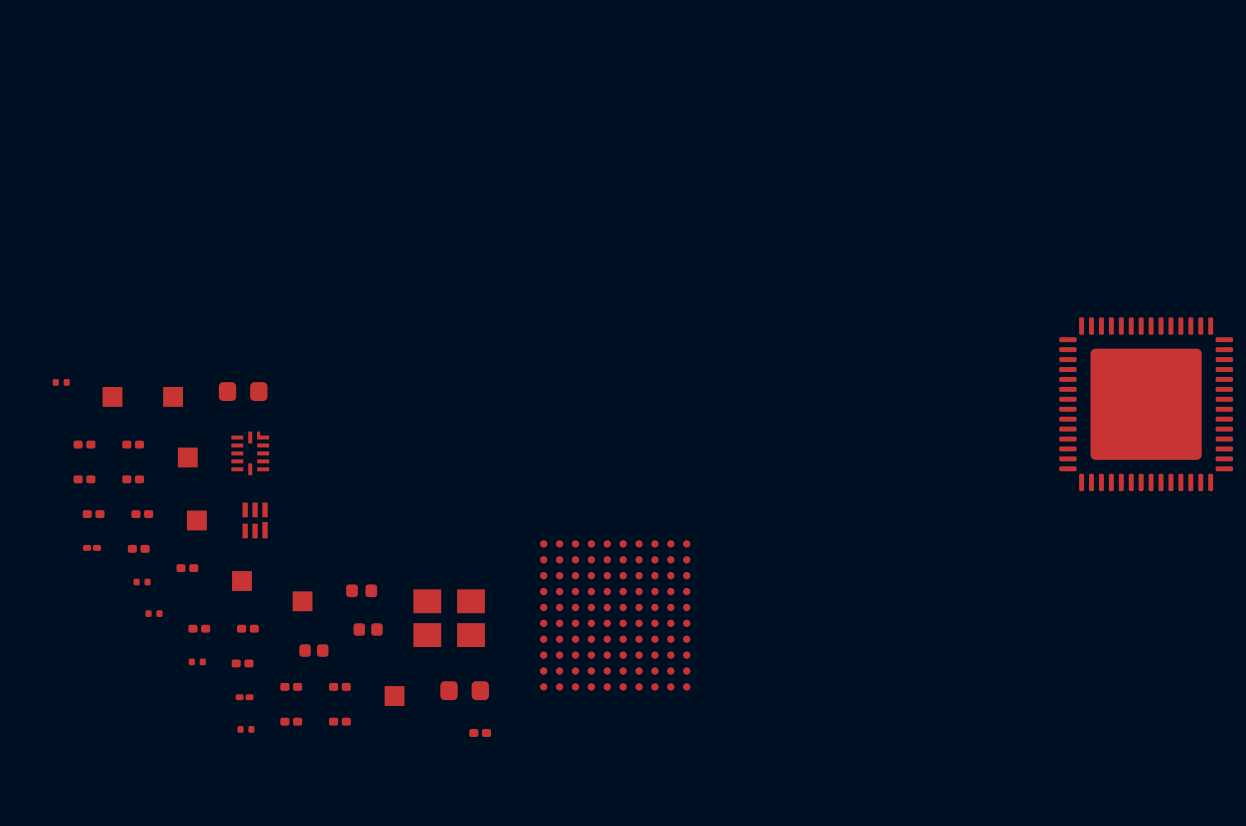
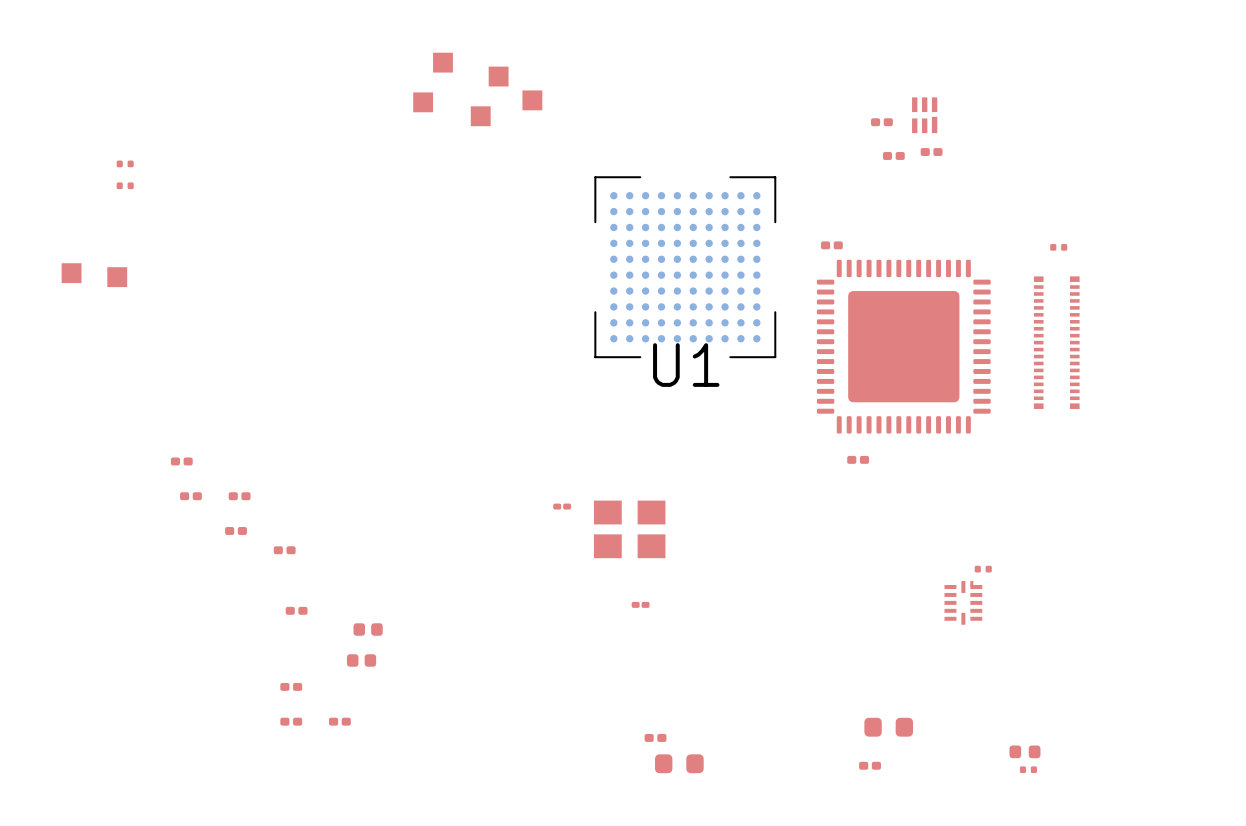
part: none -> (442, 62)
part: none -> (498, 76)
part: none -> (532, 100)
part: none -> (423, 102)
part: none -> (924, 115)
part: none -> (480, 116)
part: none -> (881, 122)
part: none -> (931, 152)
part: none -> (893, 155)
part: none -> (125, 163)
part: none -> (125, 185)
part: none -> (831, 245)
part: none -> (1058, 247)
part: none -> (71, 273)
part: none -> (117, 277)
part: none -> (1056, 342)
part: (61, 382) -> none
part: (243, 391) -> none
part: (112, 396) -> none
part: (173, 396) -> none
part position: (1146, 404) -> (903, 346)
part: (84, 444) -> none
part: (133, 444) -> none
part footprint: [177, 447, 198, 468] -> [170, 457, 193, 466]
part: (250, 453) -> none
part: none -> (858, 459)
part: (84, 479) -> none
part: (133, 479) -> none
part: none -> (190, 496)
part: none -> (239, 496)
part: none -> (562, 506)
part: (93, 514) -> none
part: (142, 514) -> none
part: (196, 520) -> none
part: (255, 520) -> none
part: none -> (236, 530)
part: (92, 547) -> none
part: (138, 548) -> none
part: none -> (284, 550)
part: (187, 568) -> none
part: none -> (983, 569)
part: (241, 581) -> none
part: (142, 582) -> none
part: (361, 590) -> none
part footprint: [292, 591, 313, 612] -> [285, 606, 308, 615]
part: none -> (963, 602)
part: none -> (640, 604)
part: (153, 613) -> none
U1 side: top (615, 615) -> bottom (685, 267)
part position: (449, 618) -> (629, 529)
part: (199, 628) -> none
part: (247, 628) -> none
part position: (313, 650) -> (361, 660)
part: (197, 661) -> none
part: (242, 663) -> none
part: (339, 686) -> none
part: (464, 690) -> none
part: (394, 696) -> none
part: (244, 697) -> none
part: none -> (888, 727)
part: (245, 729) -> none
part: (480, 732) -> none
part: none -> (655, 737)
part: none -> (1024, 751)
part: none -> (679, 763)
part: none -> (870, 765)
part: none -> (1028, 769)

